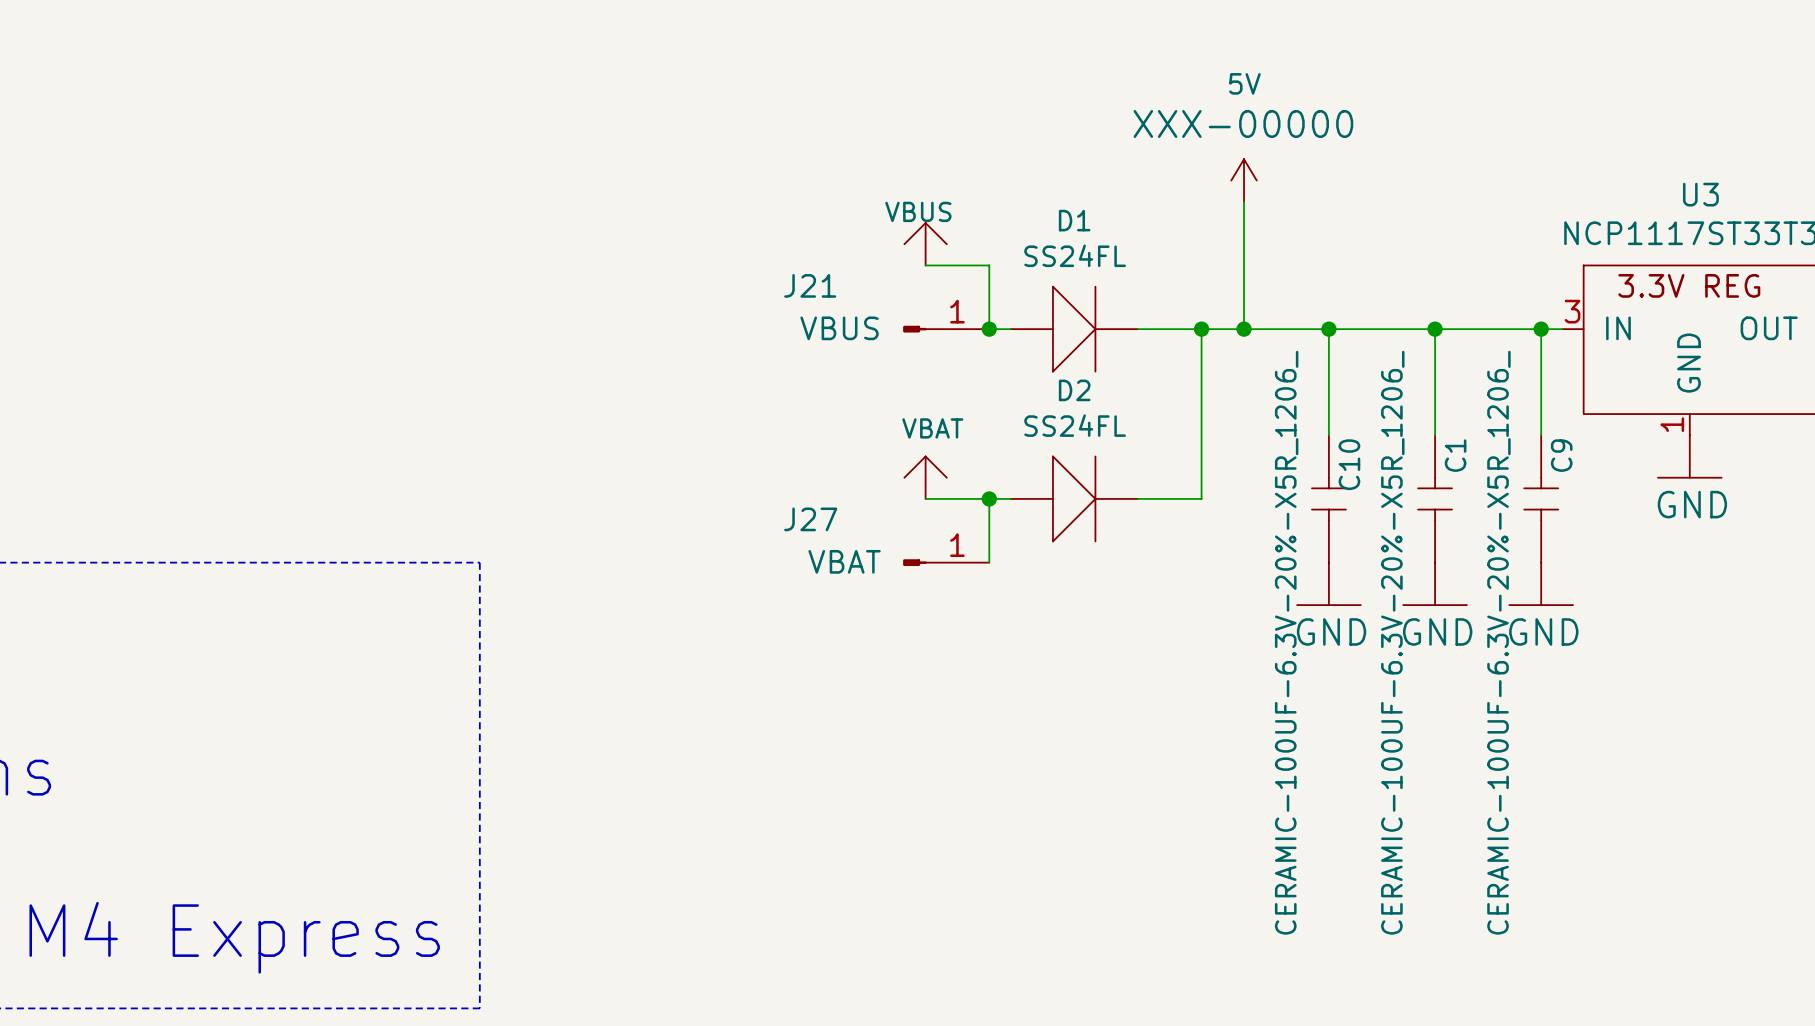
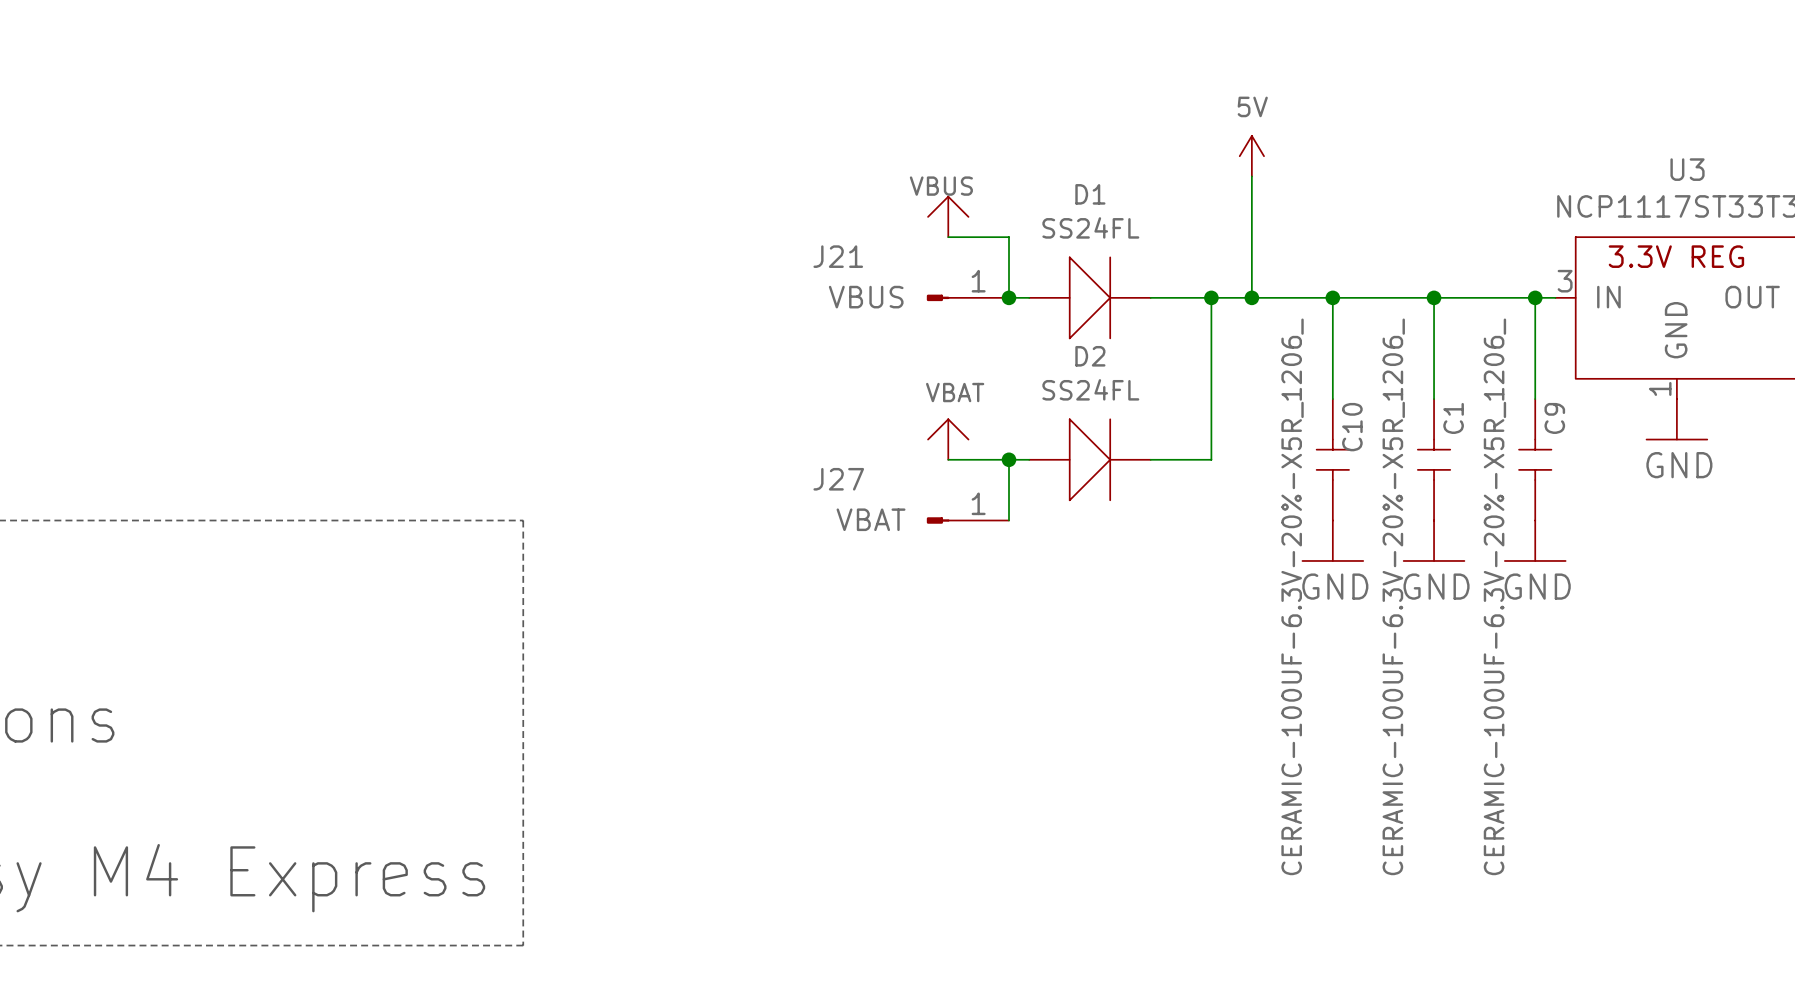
power symbol text position: 5V (1244, 83) -> 5V (1252, 106)
power symbol text: XXX-00000 (1243, 123) -> none

